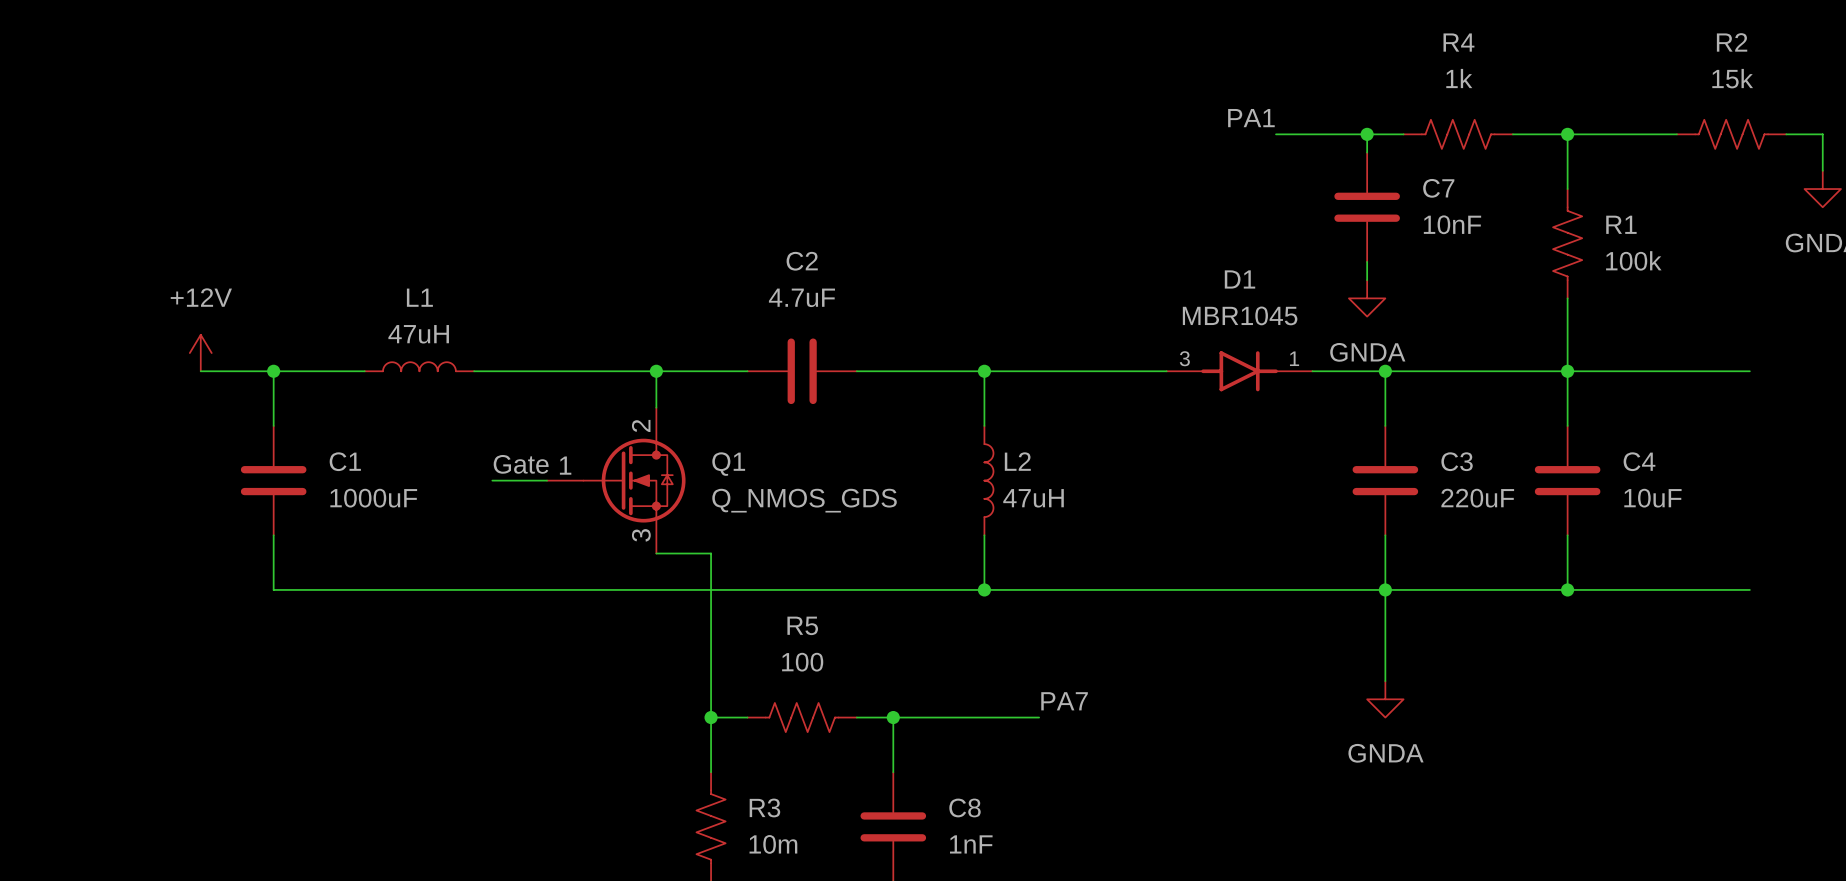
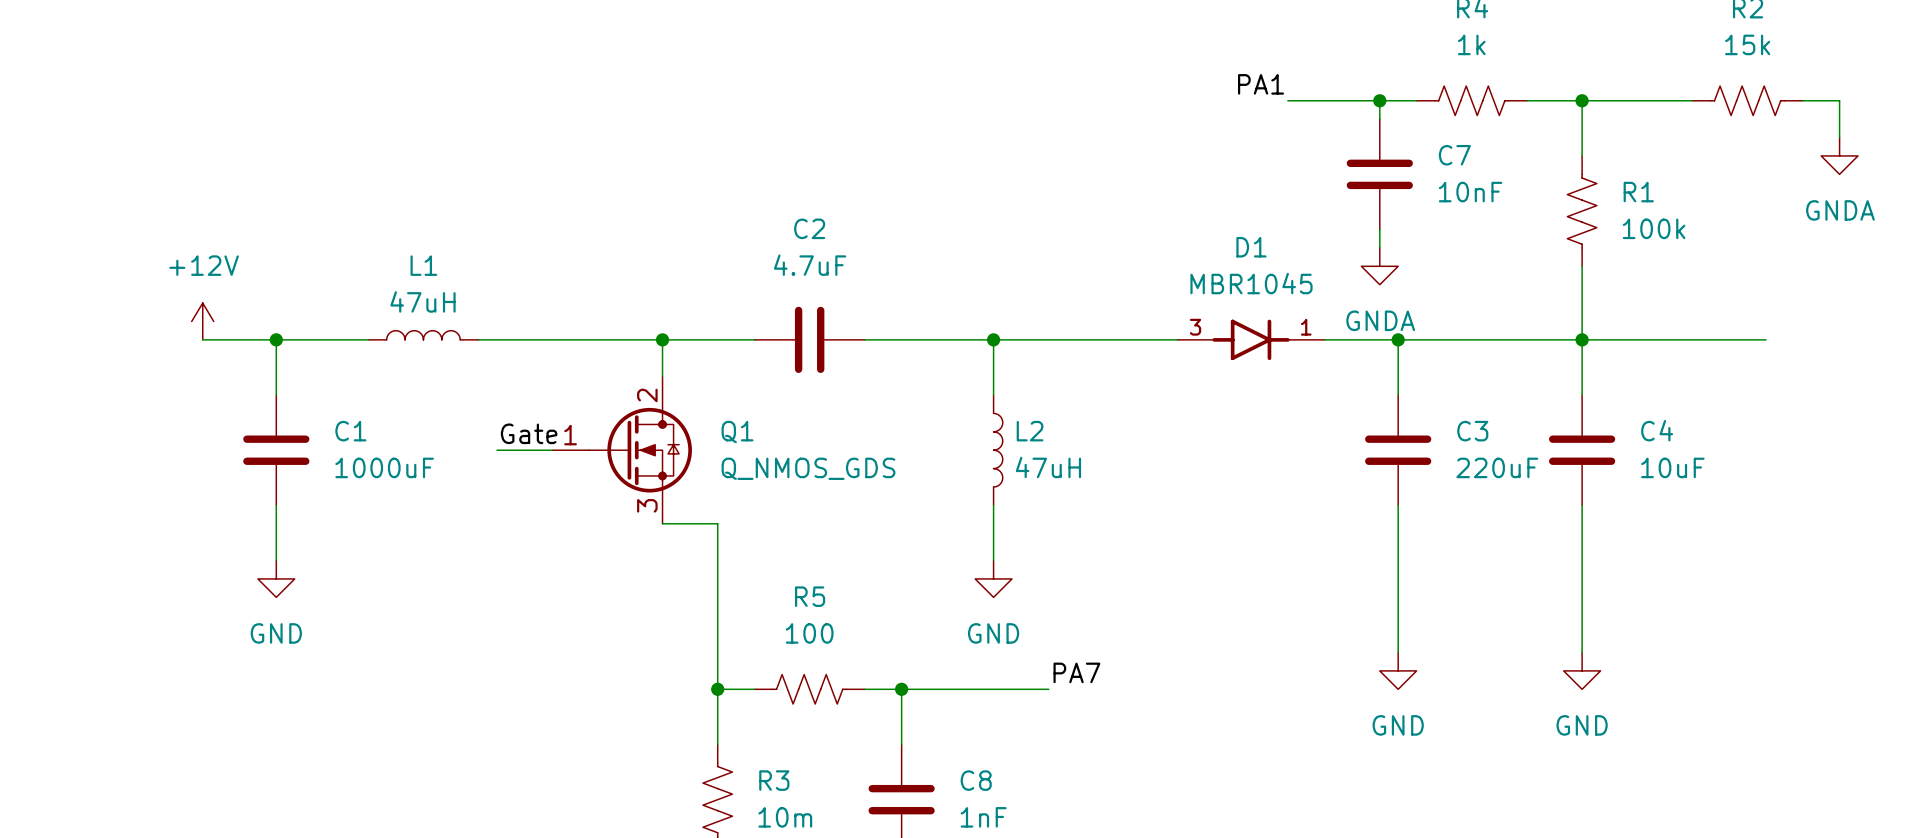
wire: (273, 589) (1749, 589) -> none
junction: (984, 589) -> none
junction: (1385, 589) -> none
wire: none -> (1582, 560) (1582, 652)
junction: (1567, 589) -> none
power symbol: none -> GND (276, 578)
power symbol: none -> GND (993, 578)
power symbol: GNDA (1385, 699) -> GND (1398, 670)
power symbol: none -> GND (1582, 670)

